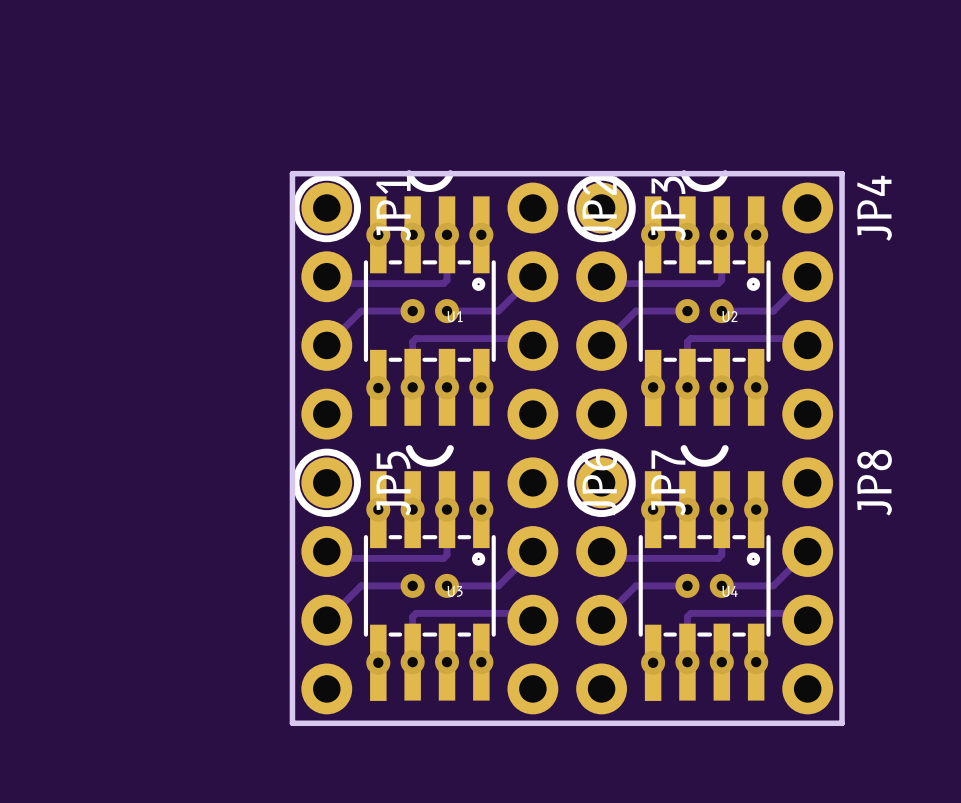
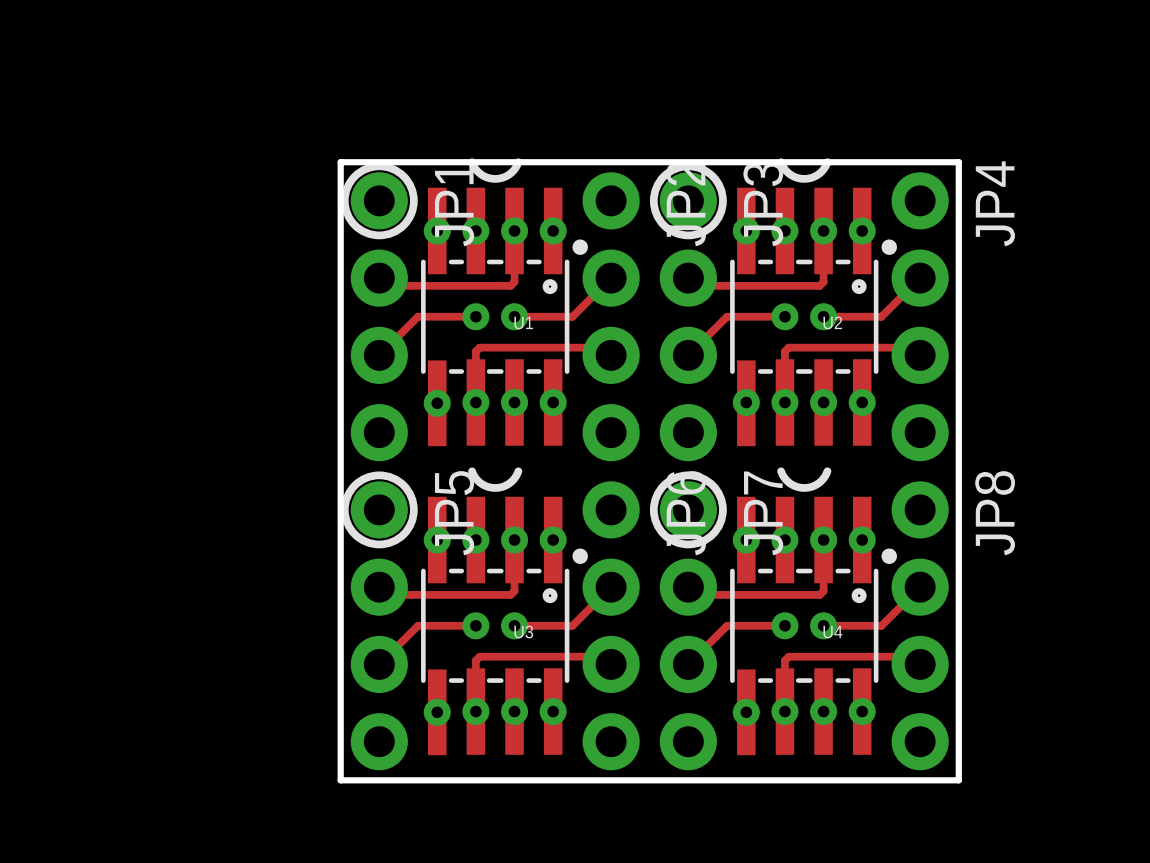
drawing: none -> [572, 239, 588, 255]
drawing: none -> [881, 239, 897, 255]
drawing: none -> [572, 548, 588, 564]
drawing: none -> [881, 548, 897, 564]

